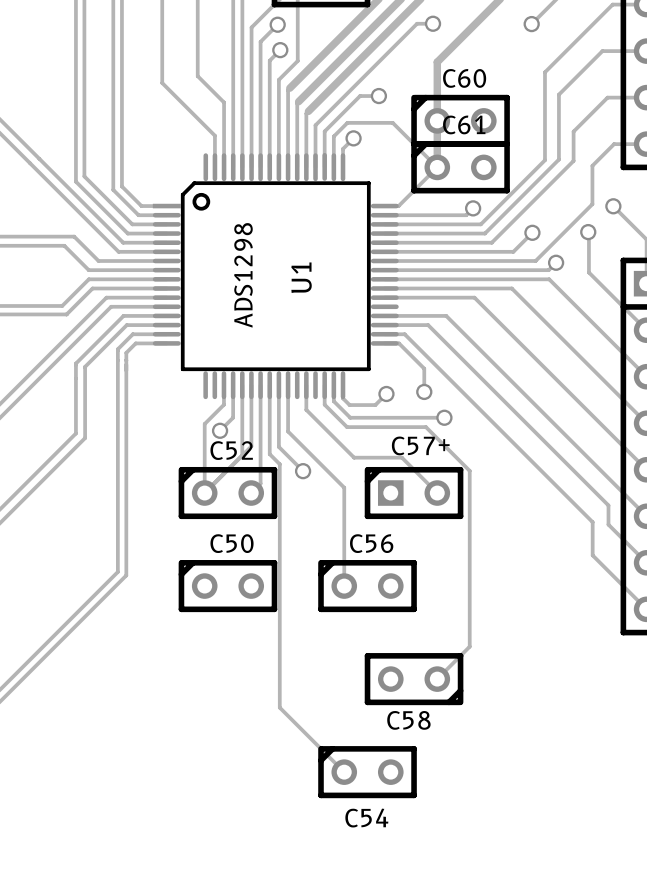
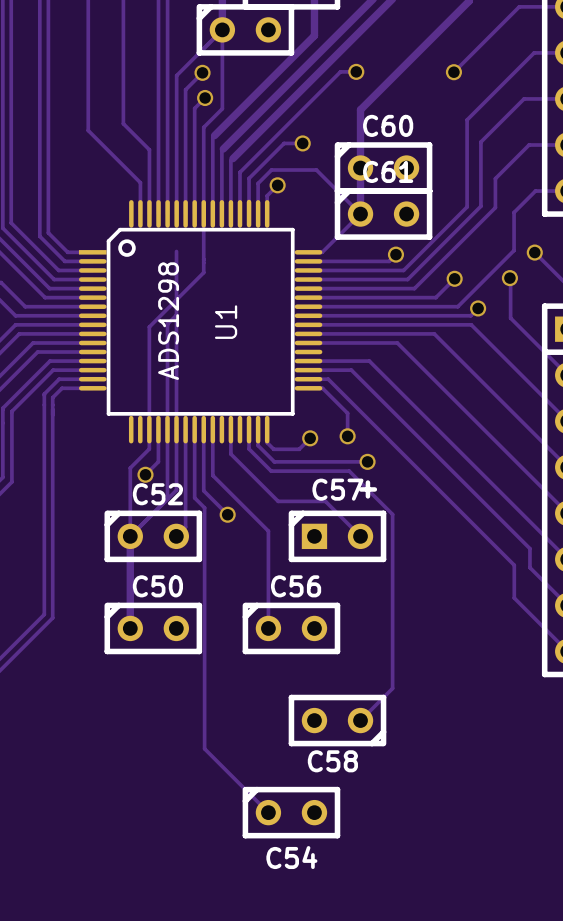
track: none -> (203, 213) (203, 272) (149, 327) (149, 429)
track: none -> (176, 251) (176, 429)
track: none -> (176, 315) (167, 324) (167, 429)
track: none -> (130, 536) (130, 628)

